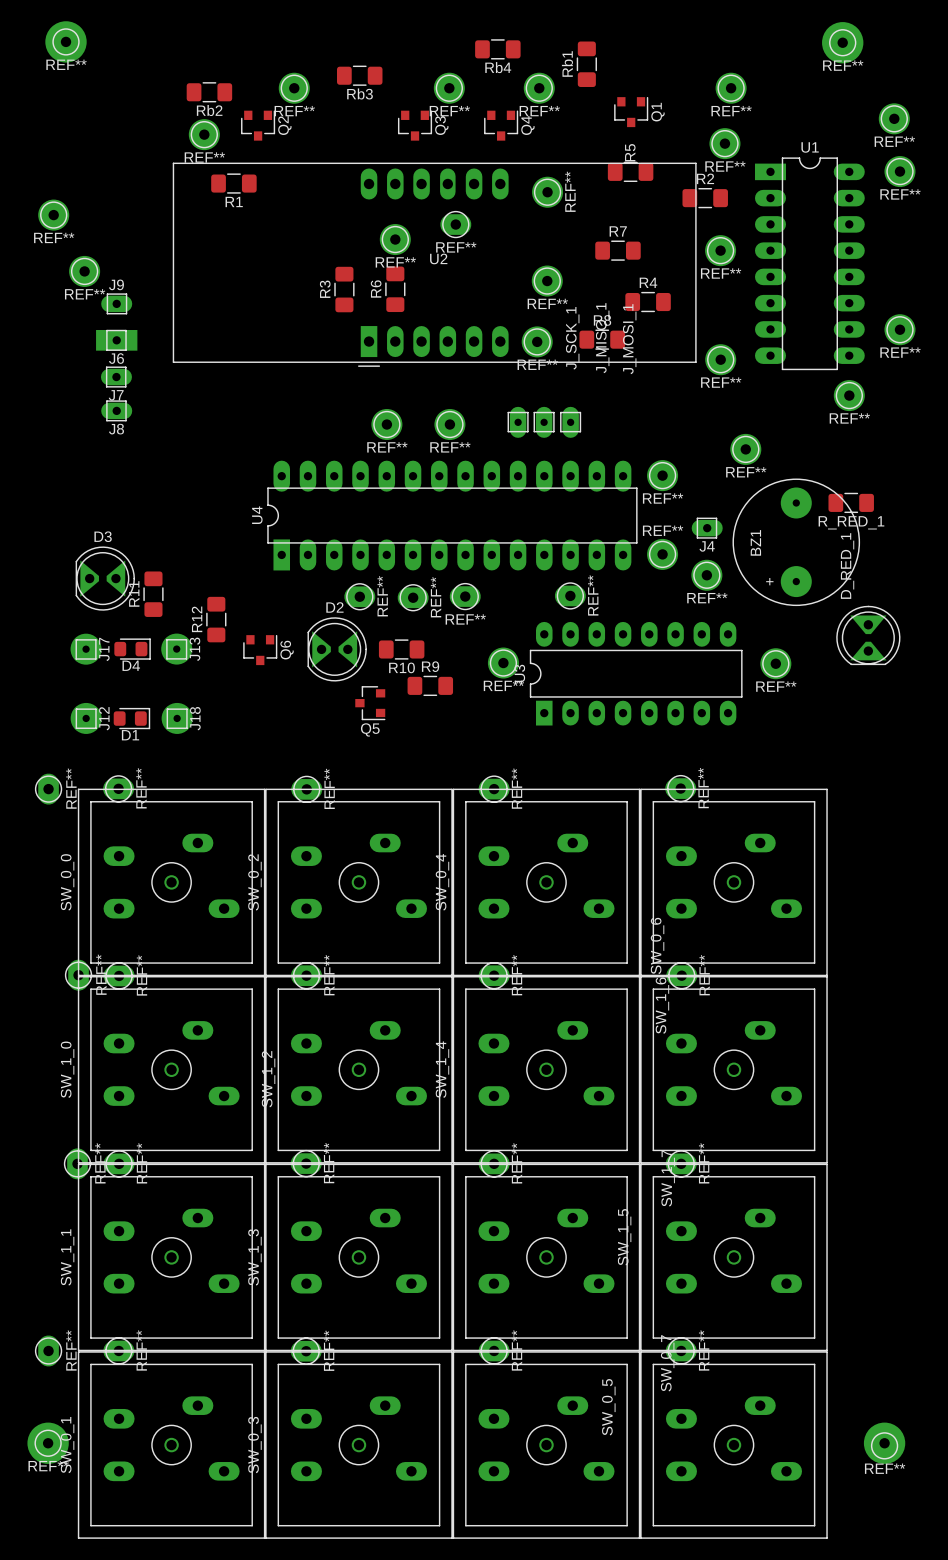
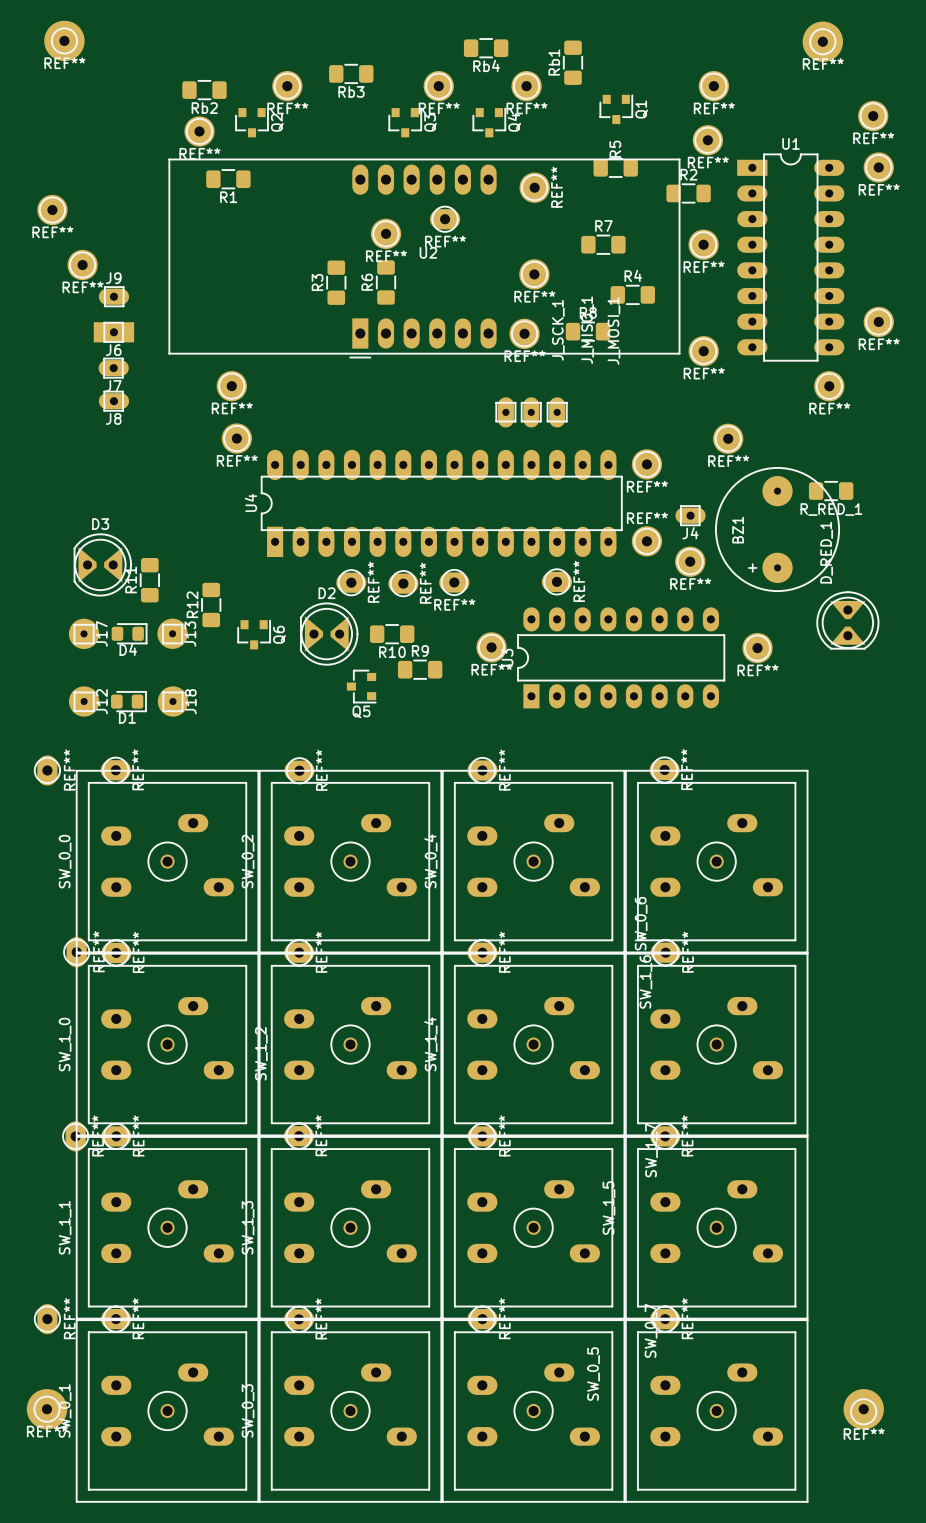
REF**: none -> (231, 386)
REF**: (386, 424) -> none
REF**: (449, 424) -> none
REF**: none -> (236, 438)

